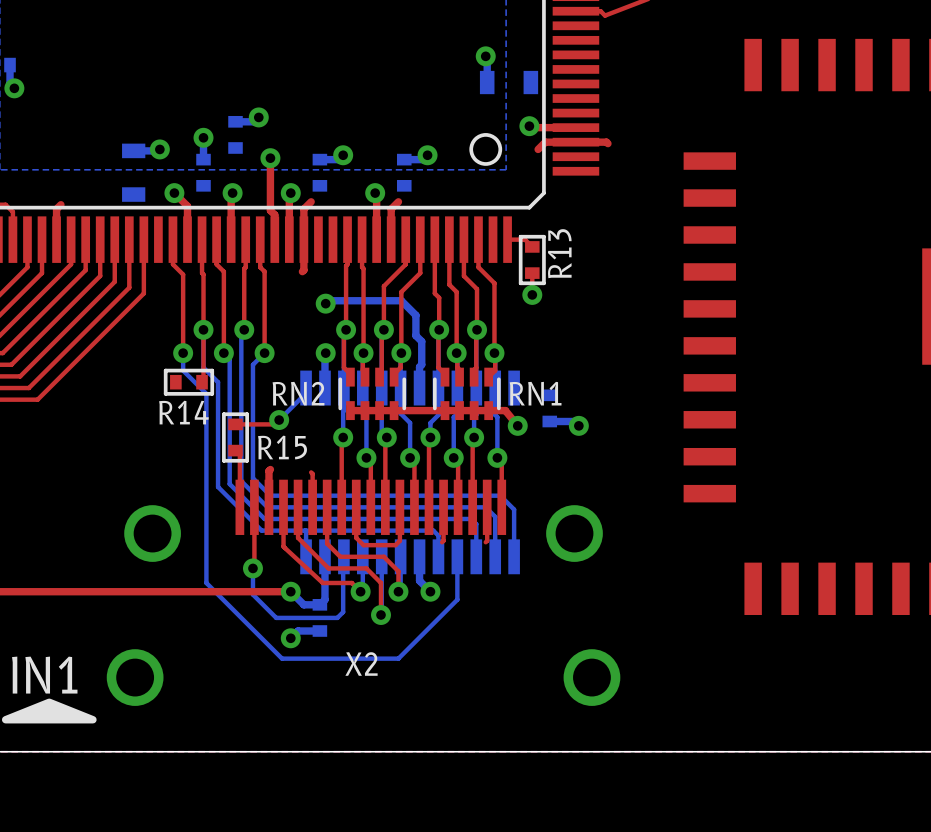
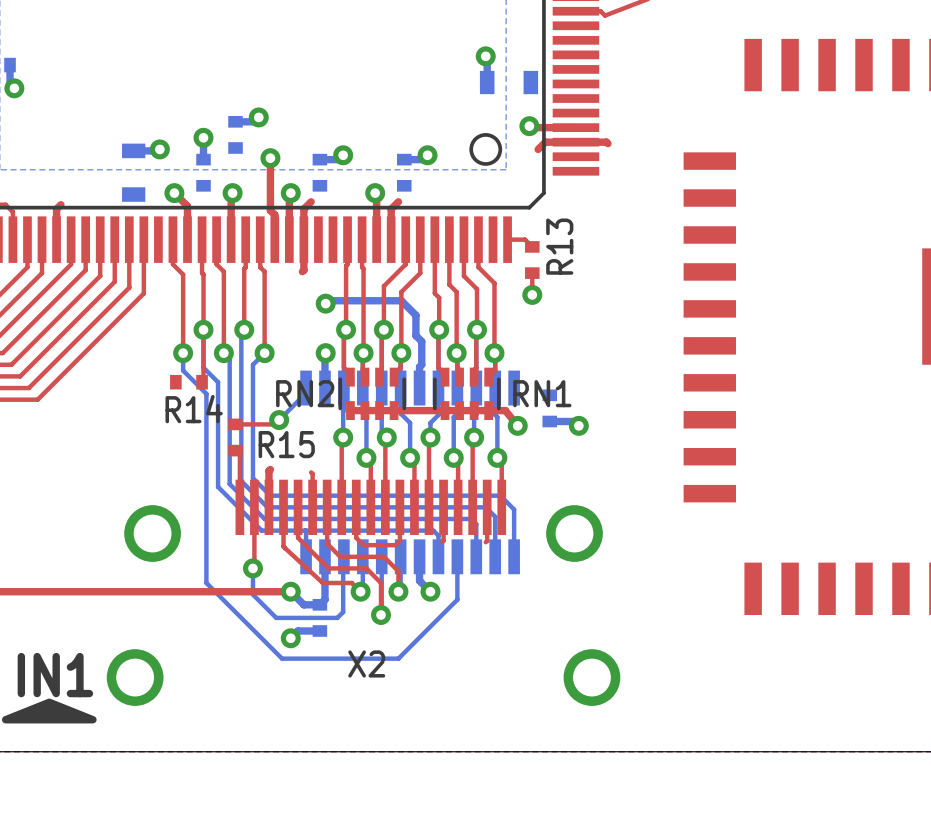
R13 footprint: [518, 234, 546, 286] -> [525, 241, 540, 279]
R14 footprint: [163, 368, 215, 396] -> [170, 374, 208, 390]
R15 footprint: [222, 412, 250, 463] -> [228, 418, 243, 457]

